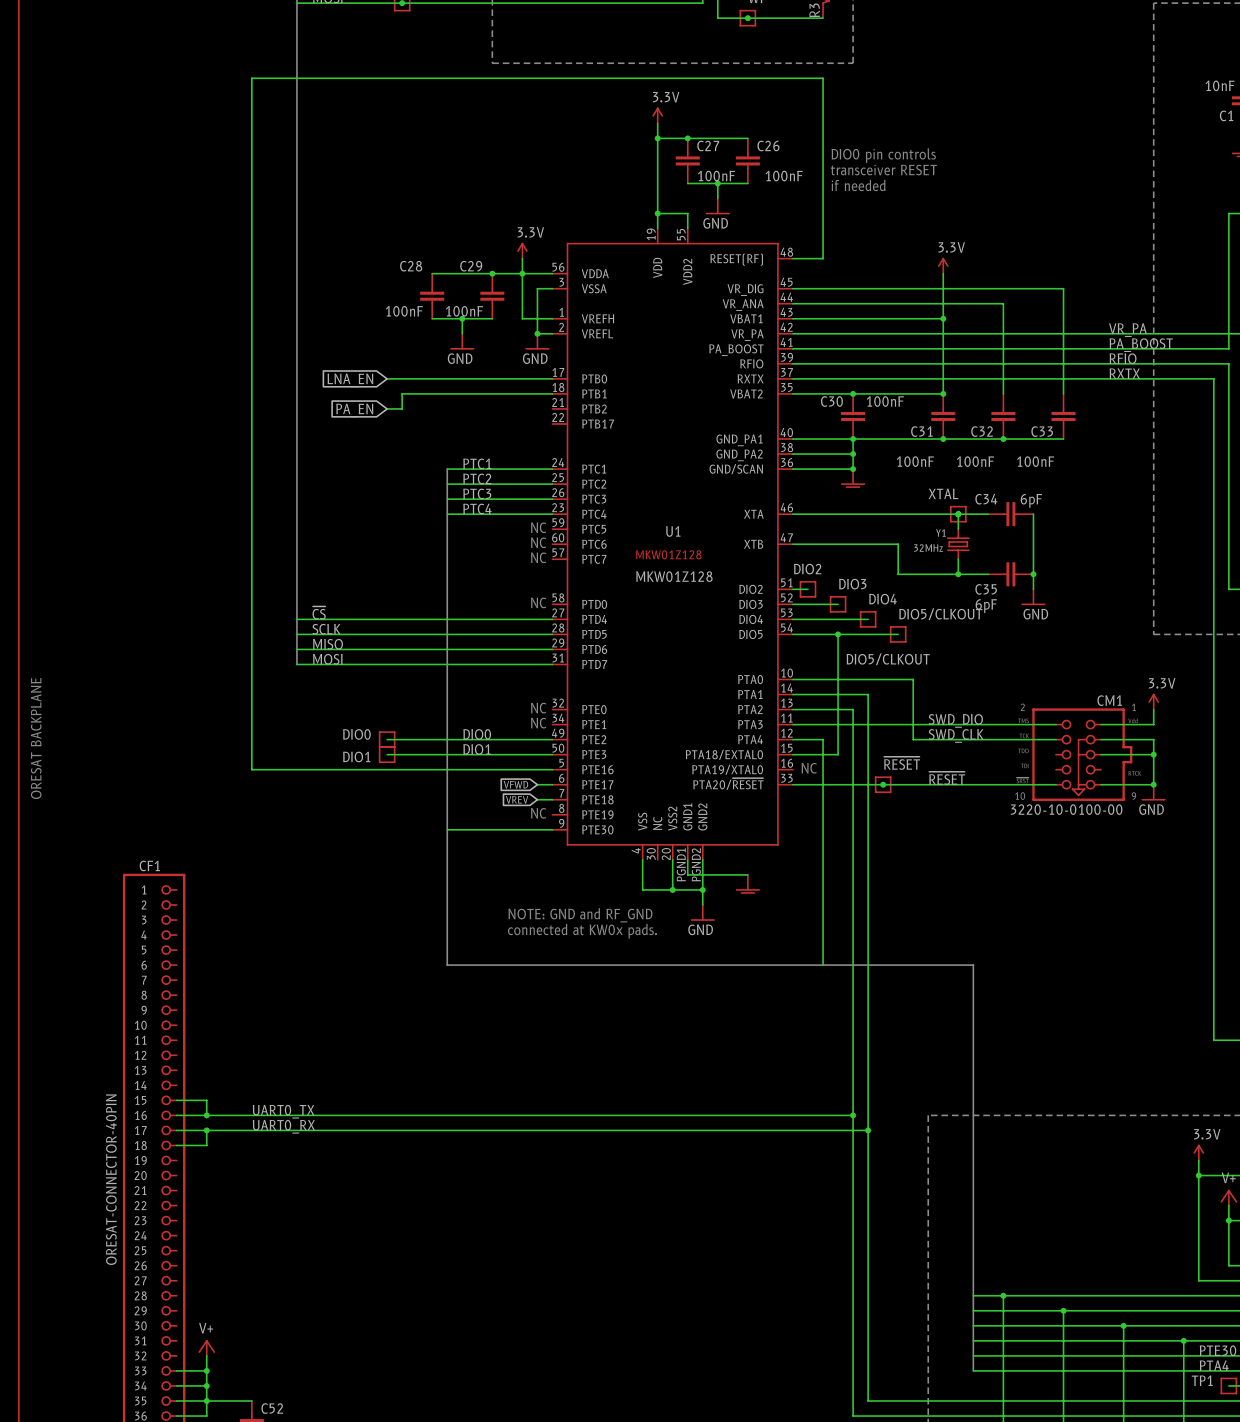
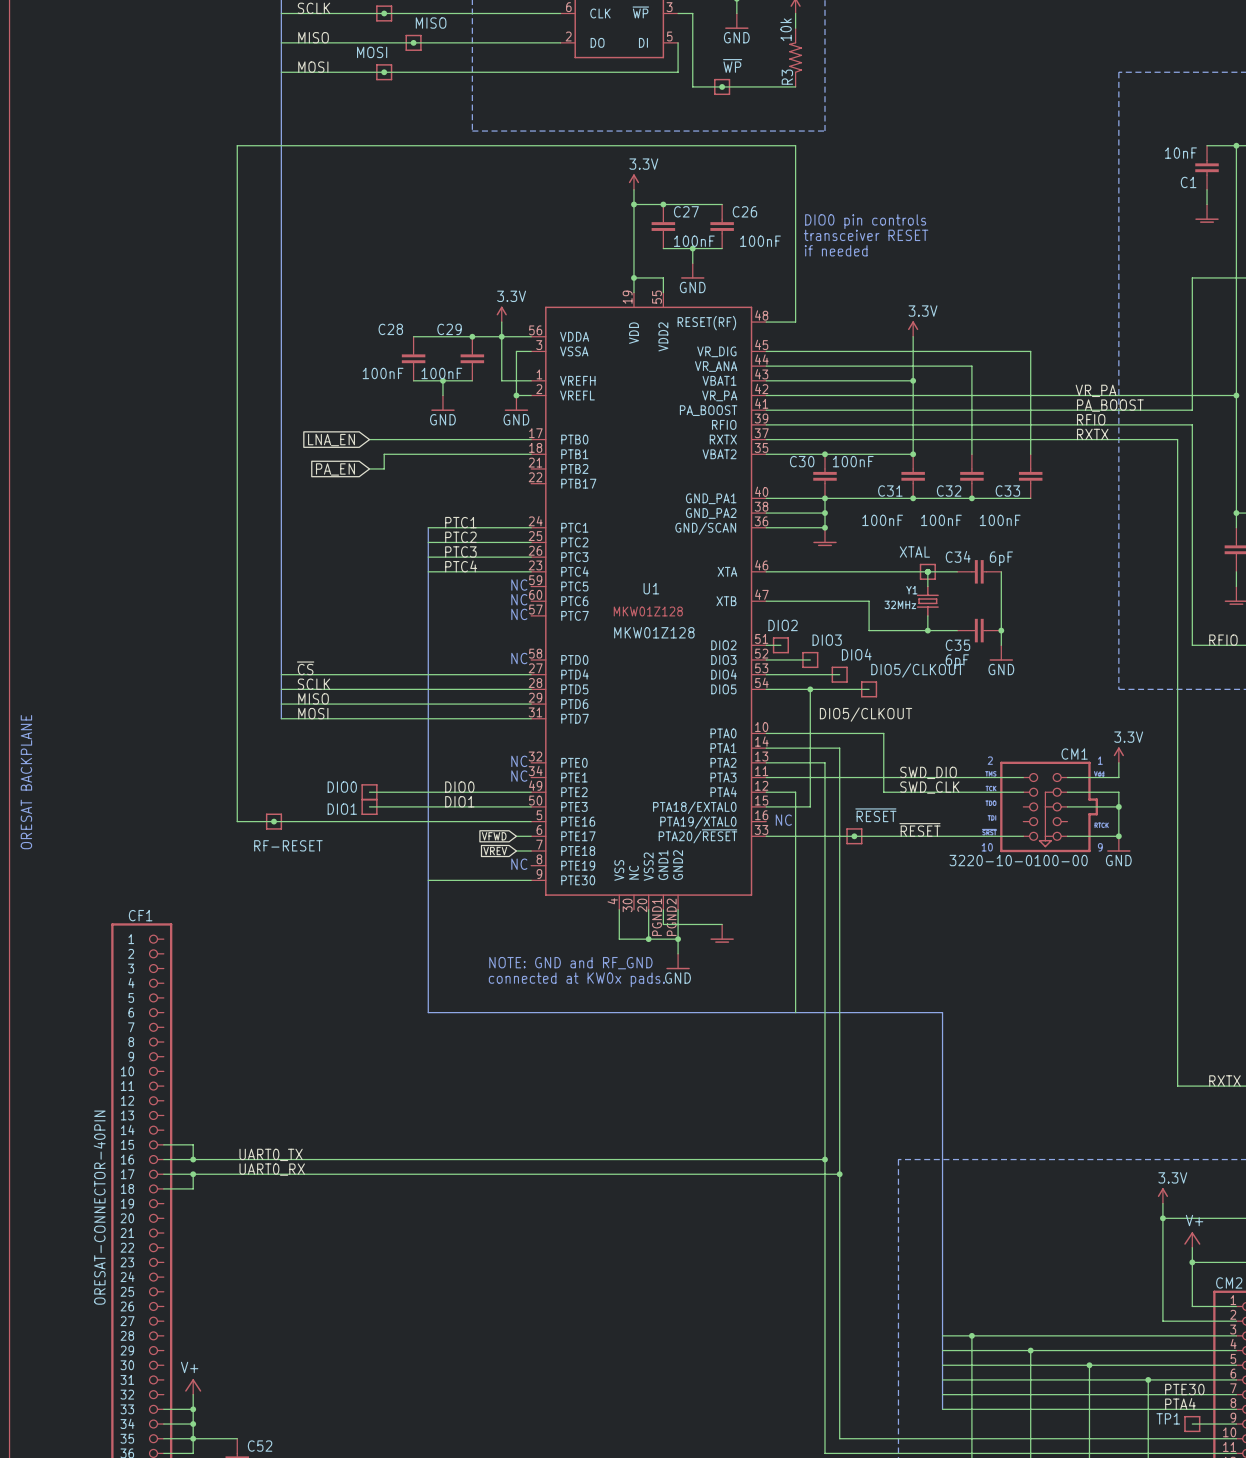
RF-RESET: none -> (274, 821)
junction: none -> (274, 821)

